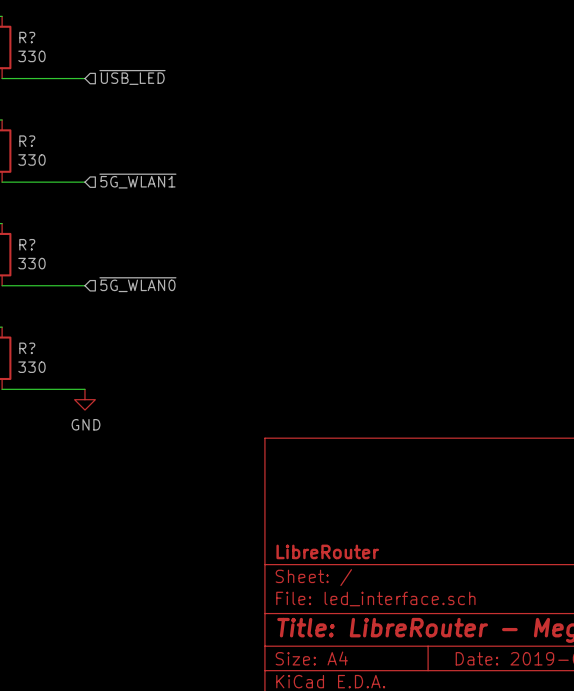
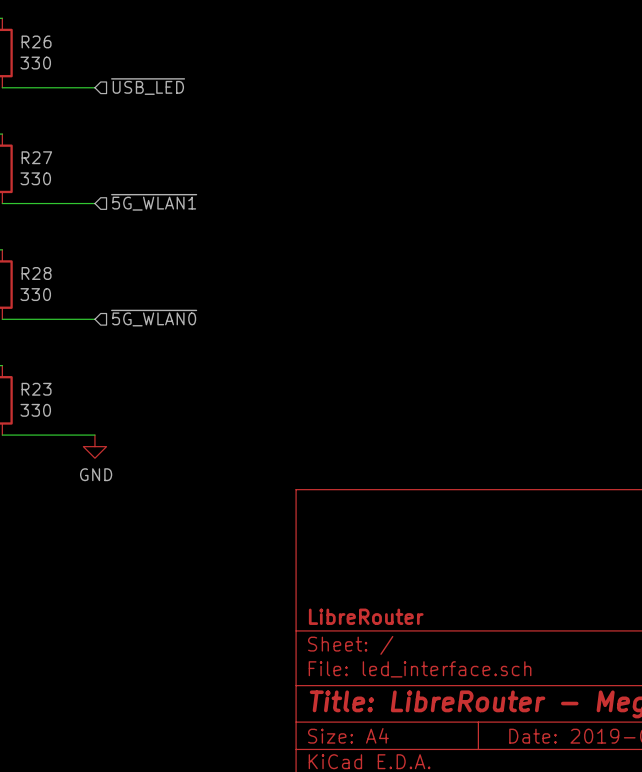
R? name: R? (27, 37) -> R26 (36, 41)
R? name: R? (27, 141) -> R27 (36, 157)
R? name: R? (27, 244) -> R28 (36, 273)
R? name: R? (27, 348) -> R23 (36, 389)

